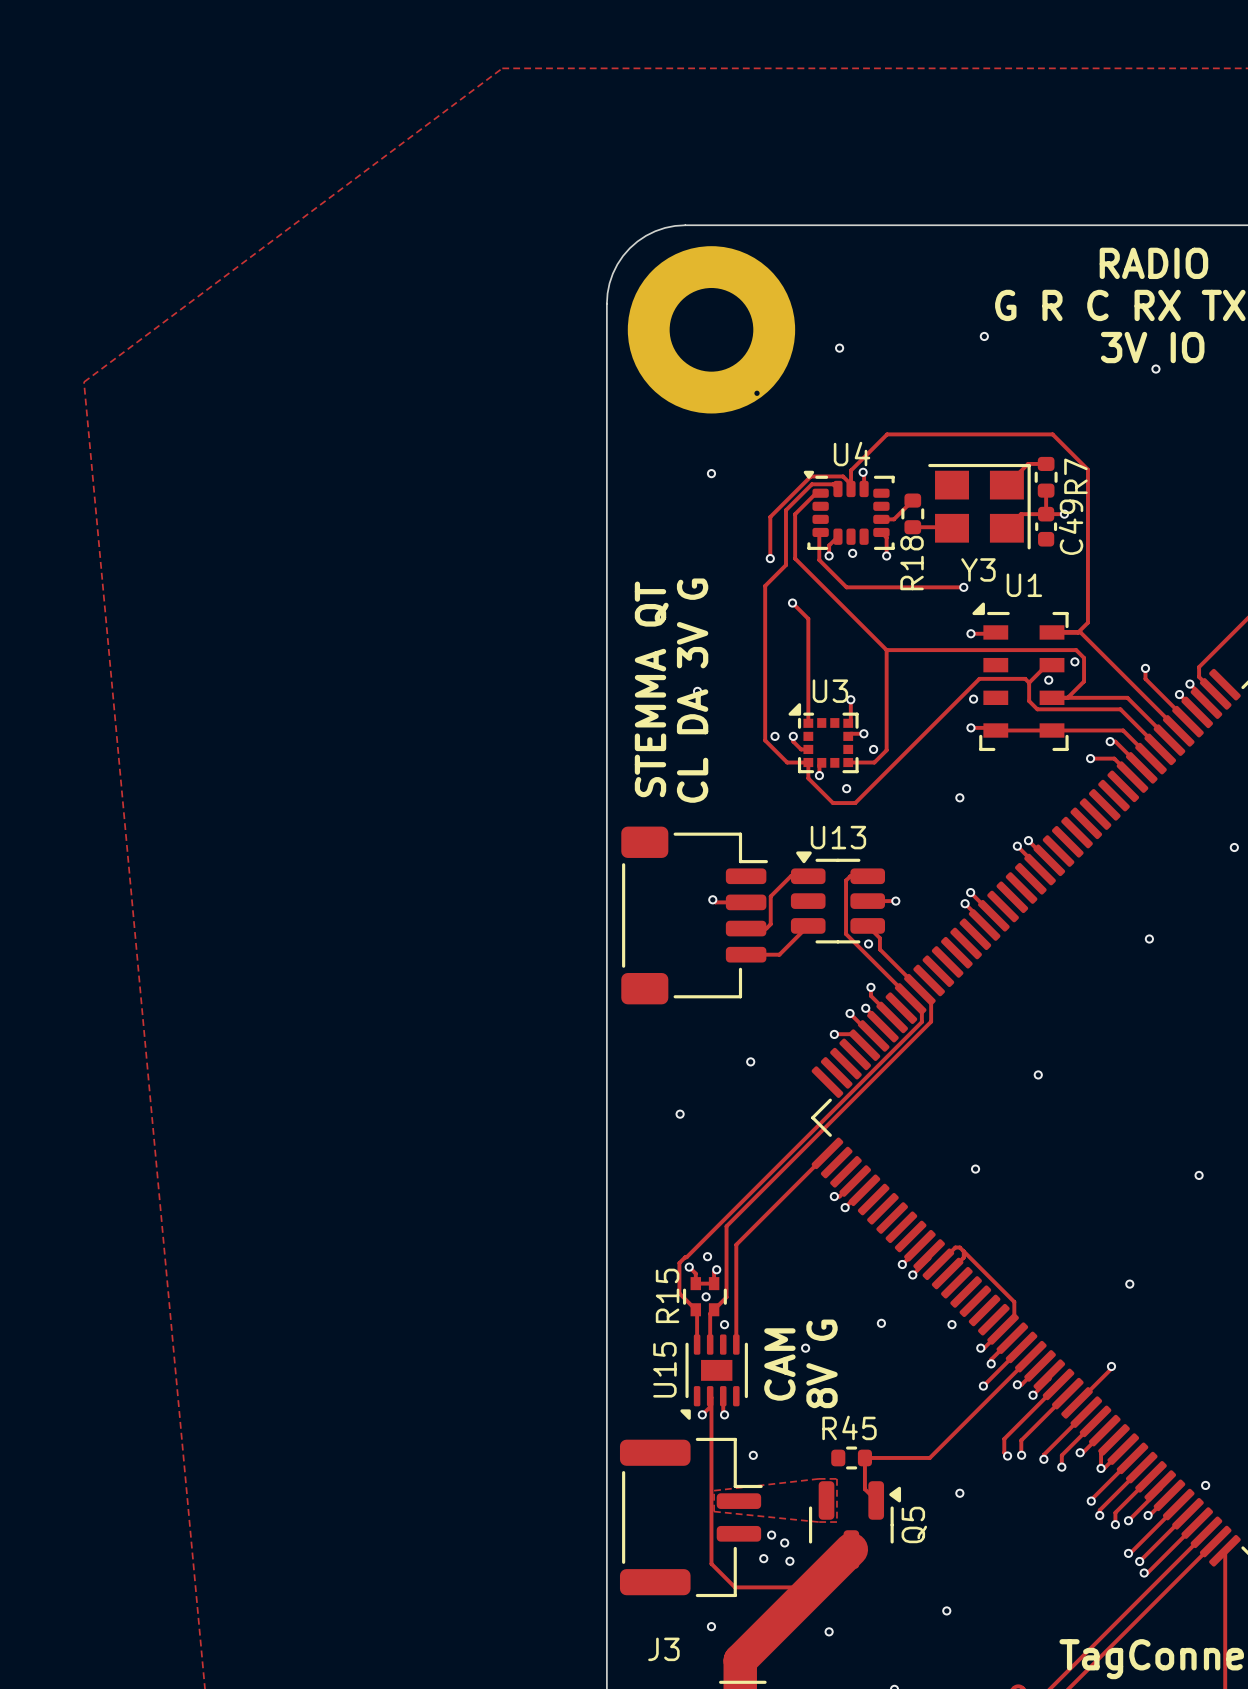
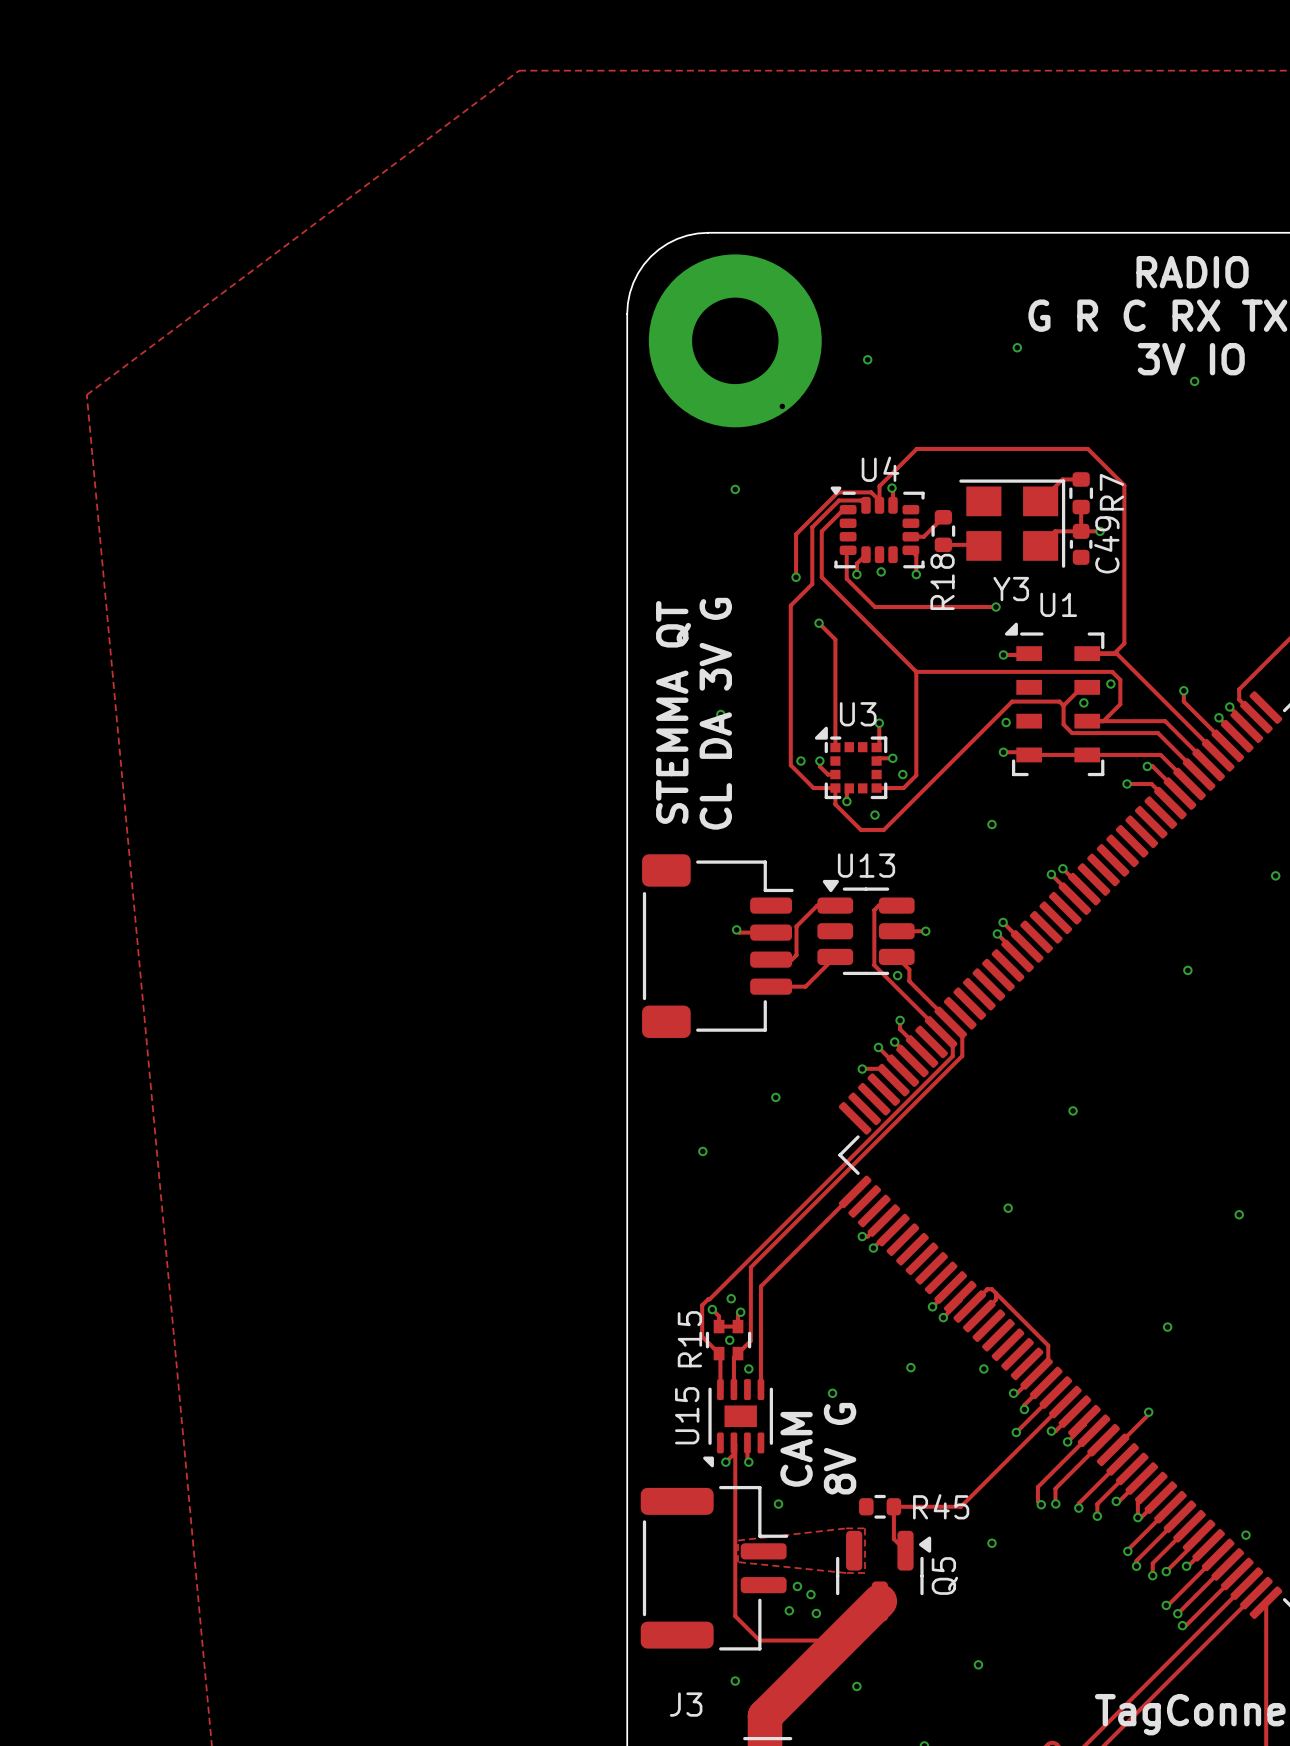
text position: 8V G (822, 1363) -> 8V G (840, 1448)
text position: CAM (779, 1364) -> CAM (796, 1449)
R45 name position: R45 (849, 1427) -> R45 (941, 1506)

